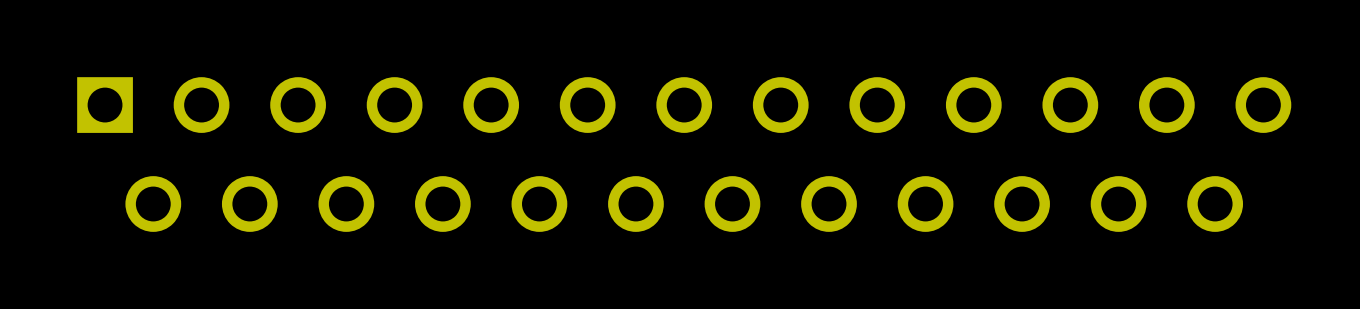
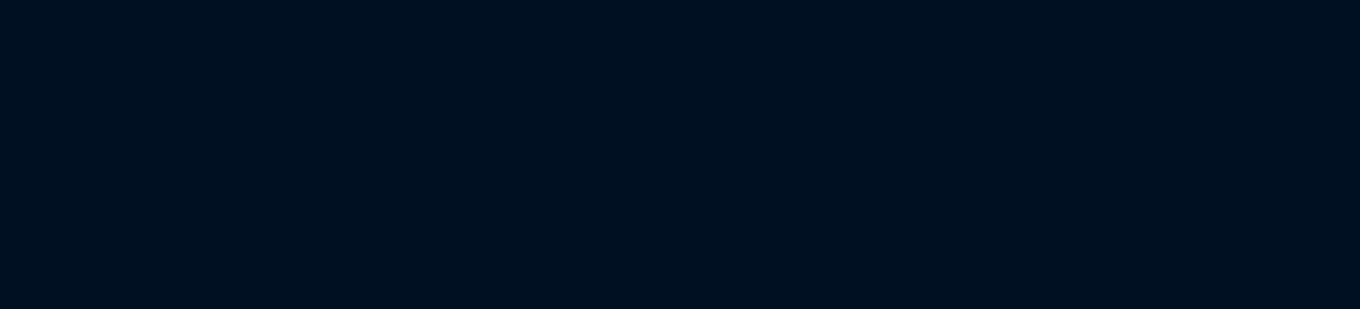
part: (684, 154) -> none

